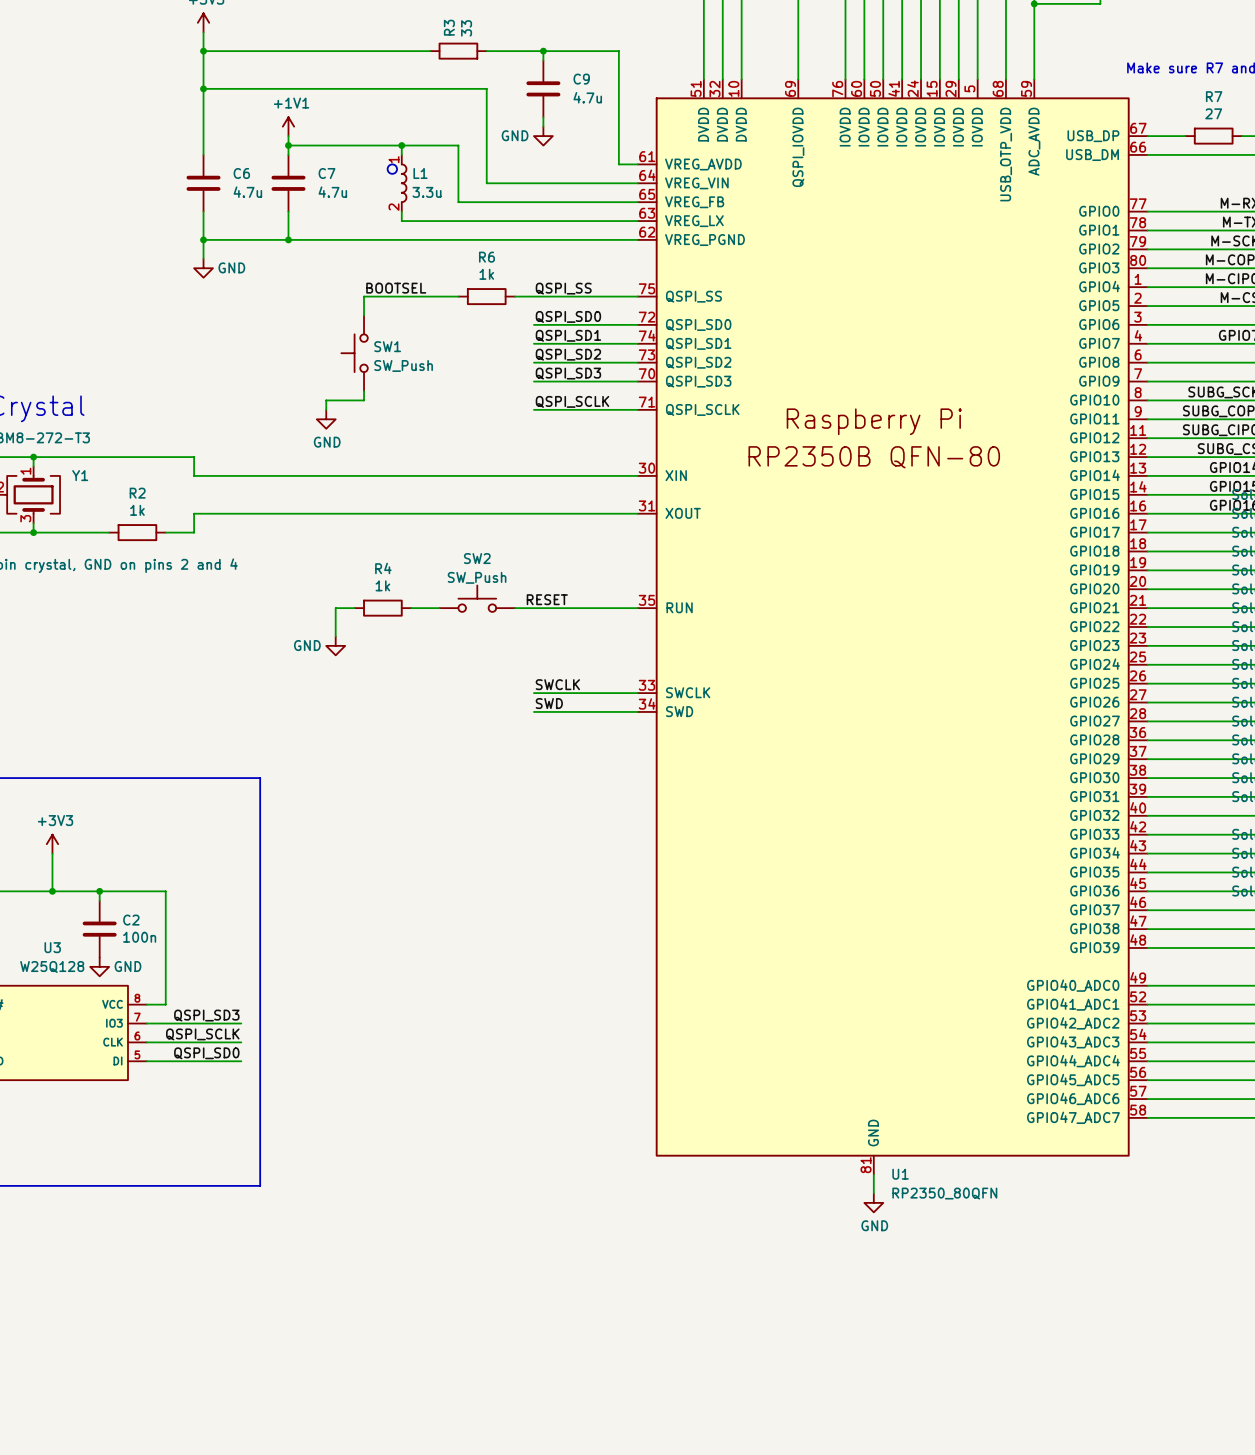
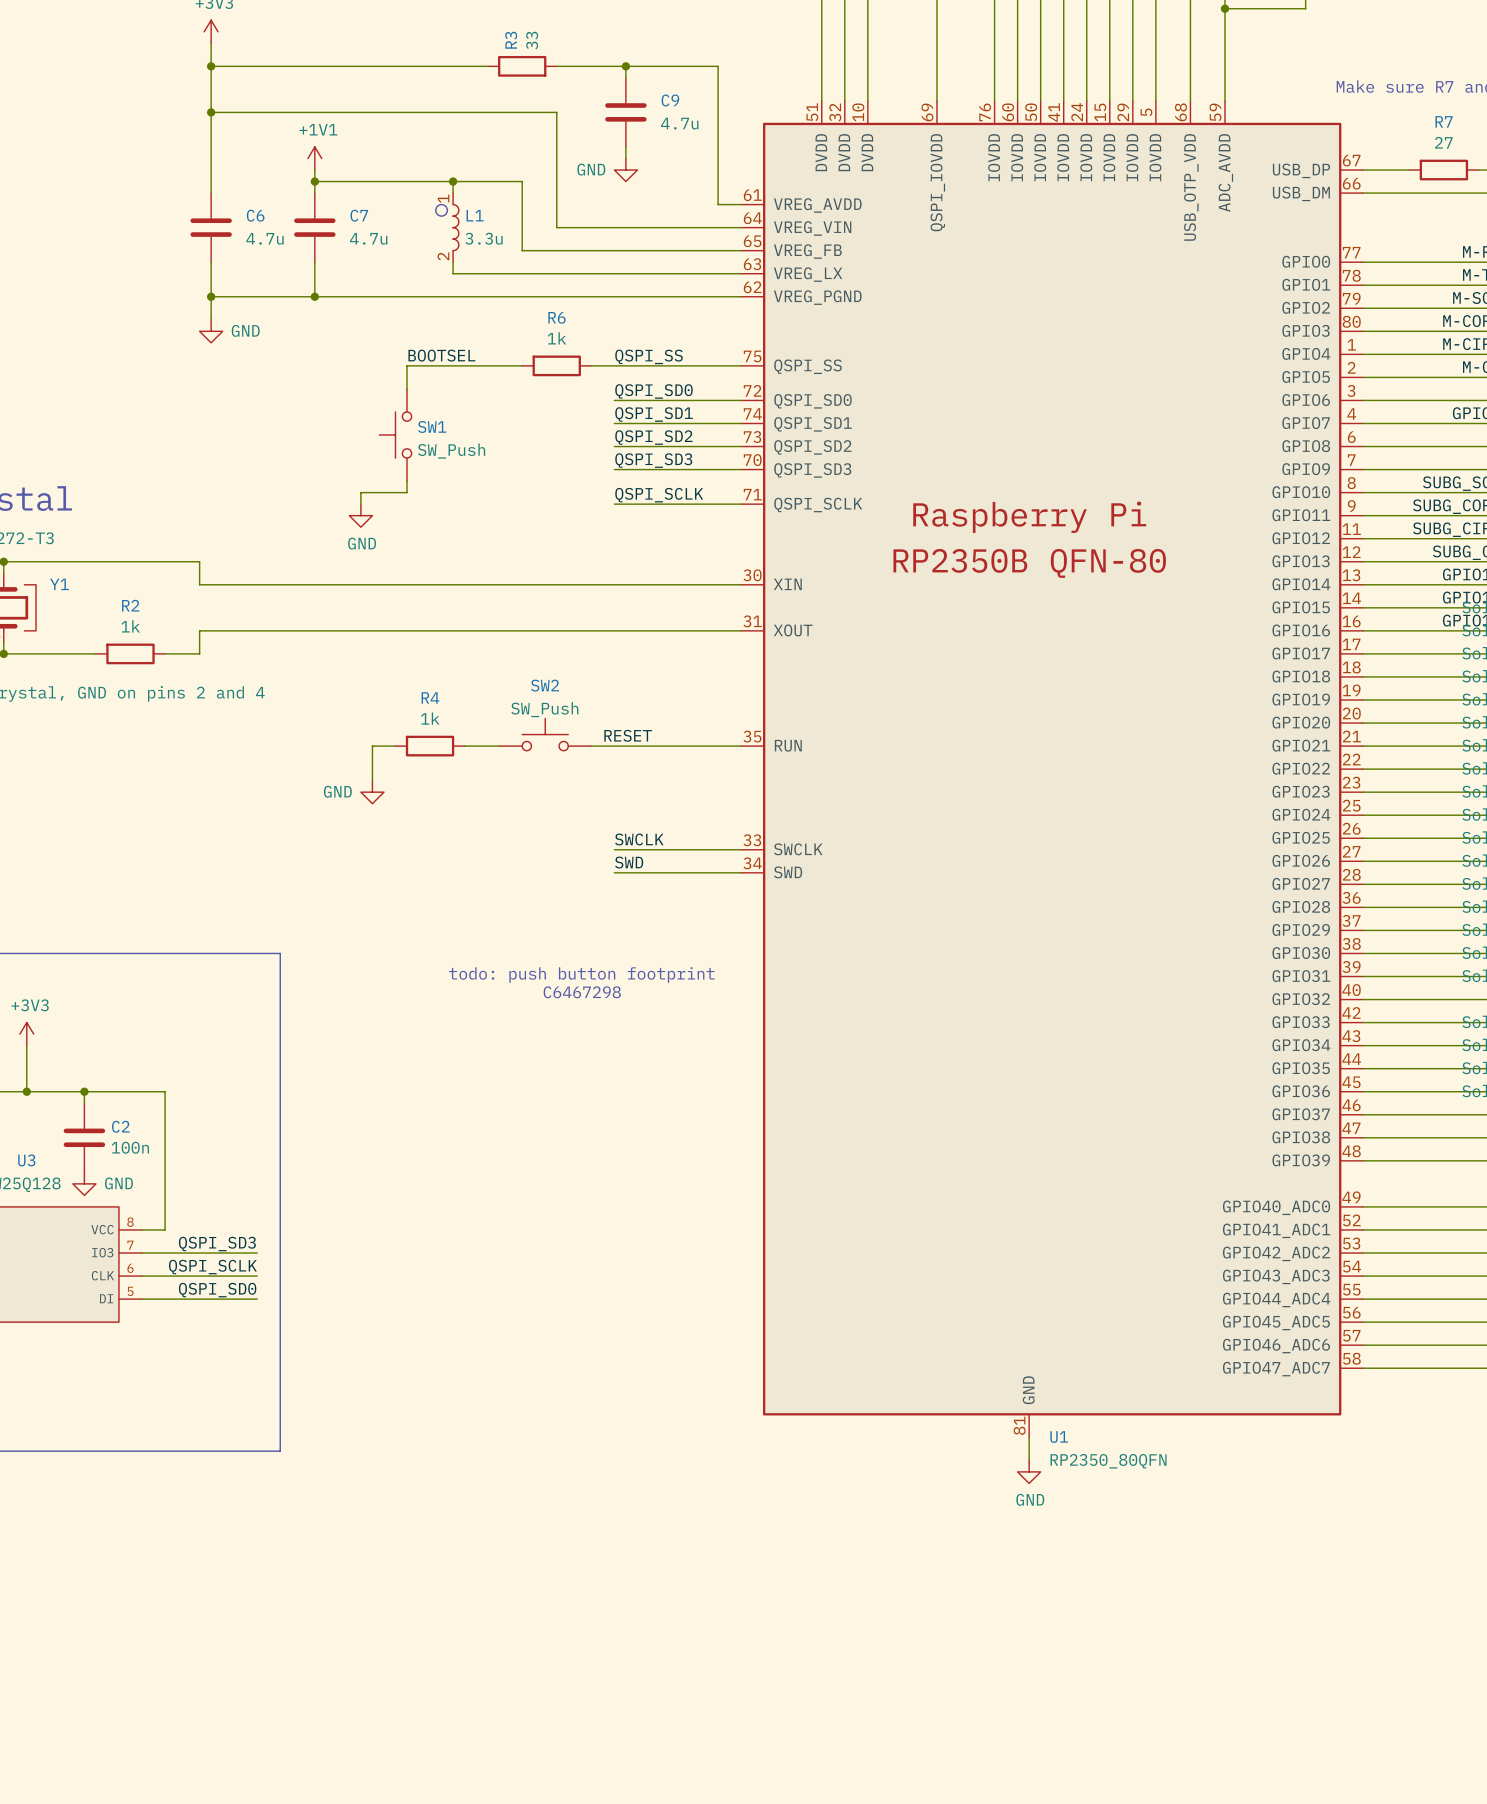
text: none -> todo: push button footprint (581, 974)
text: none -> C6467298 (582, 992)

